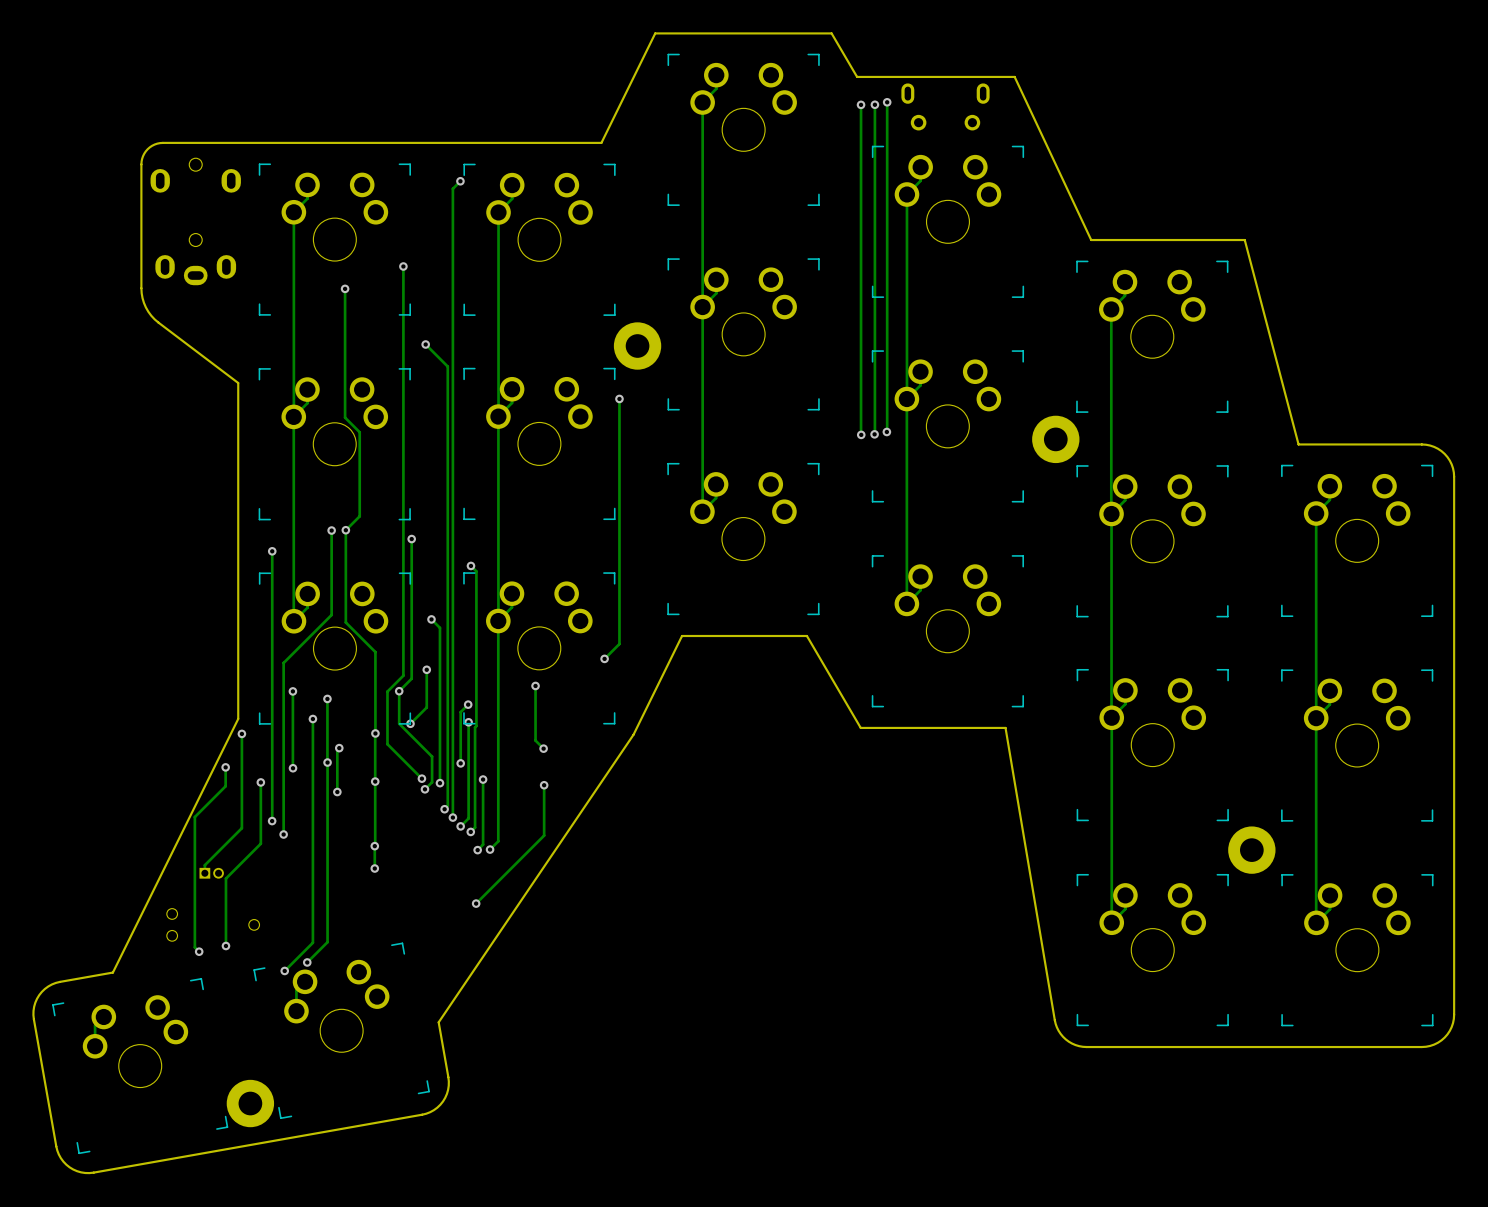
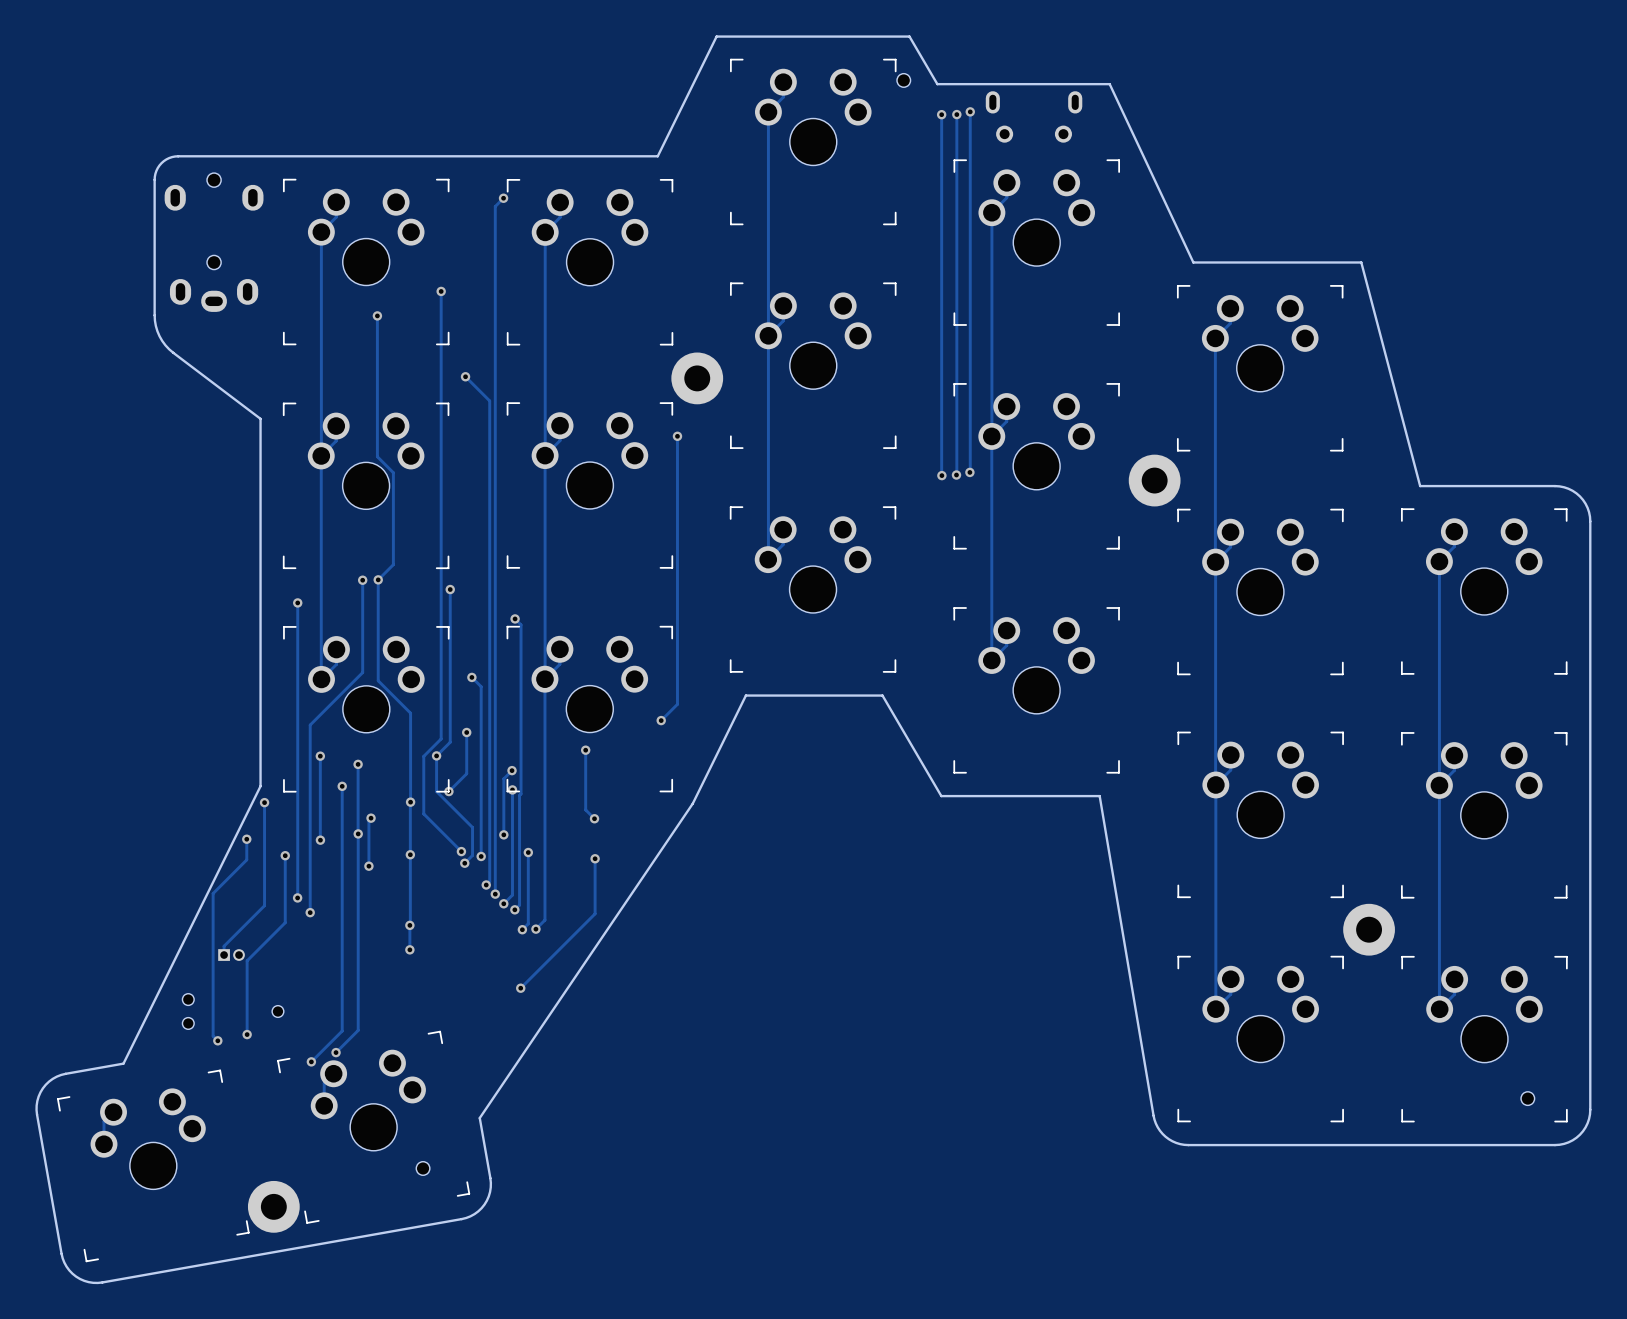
part: none -> (903, 80)
part: none -> (1527, 1098)
part: none -> (423, 1168)

